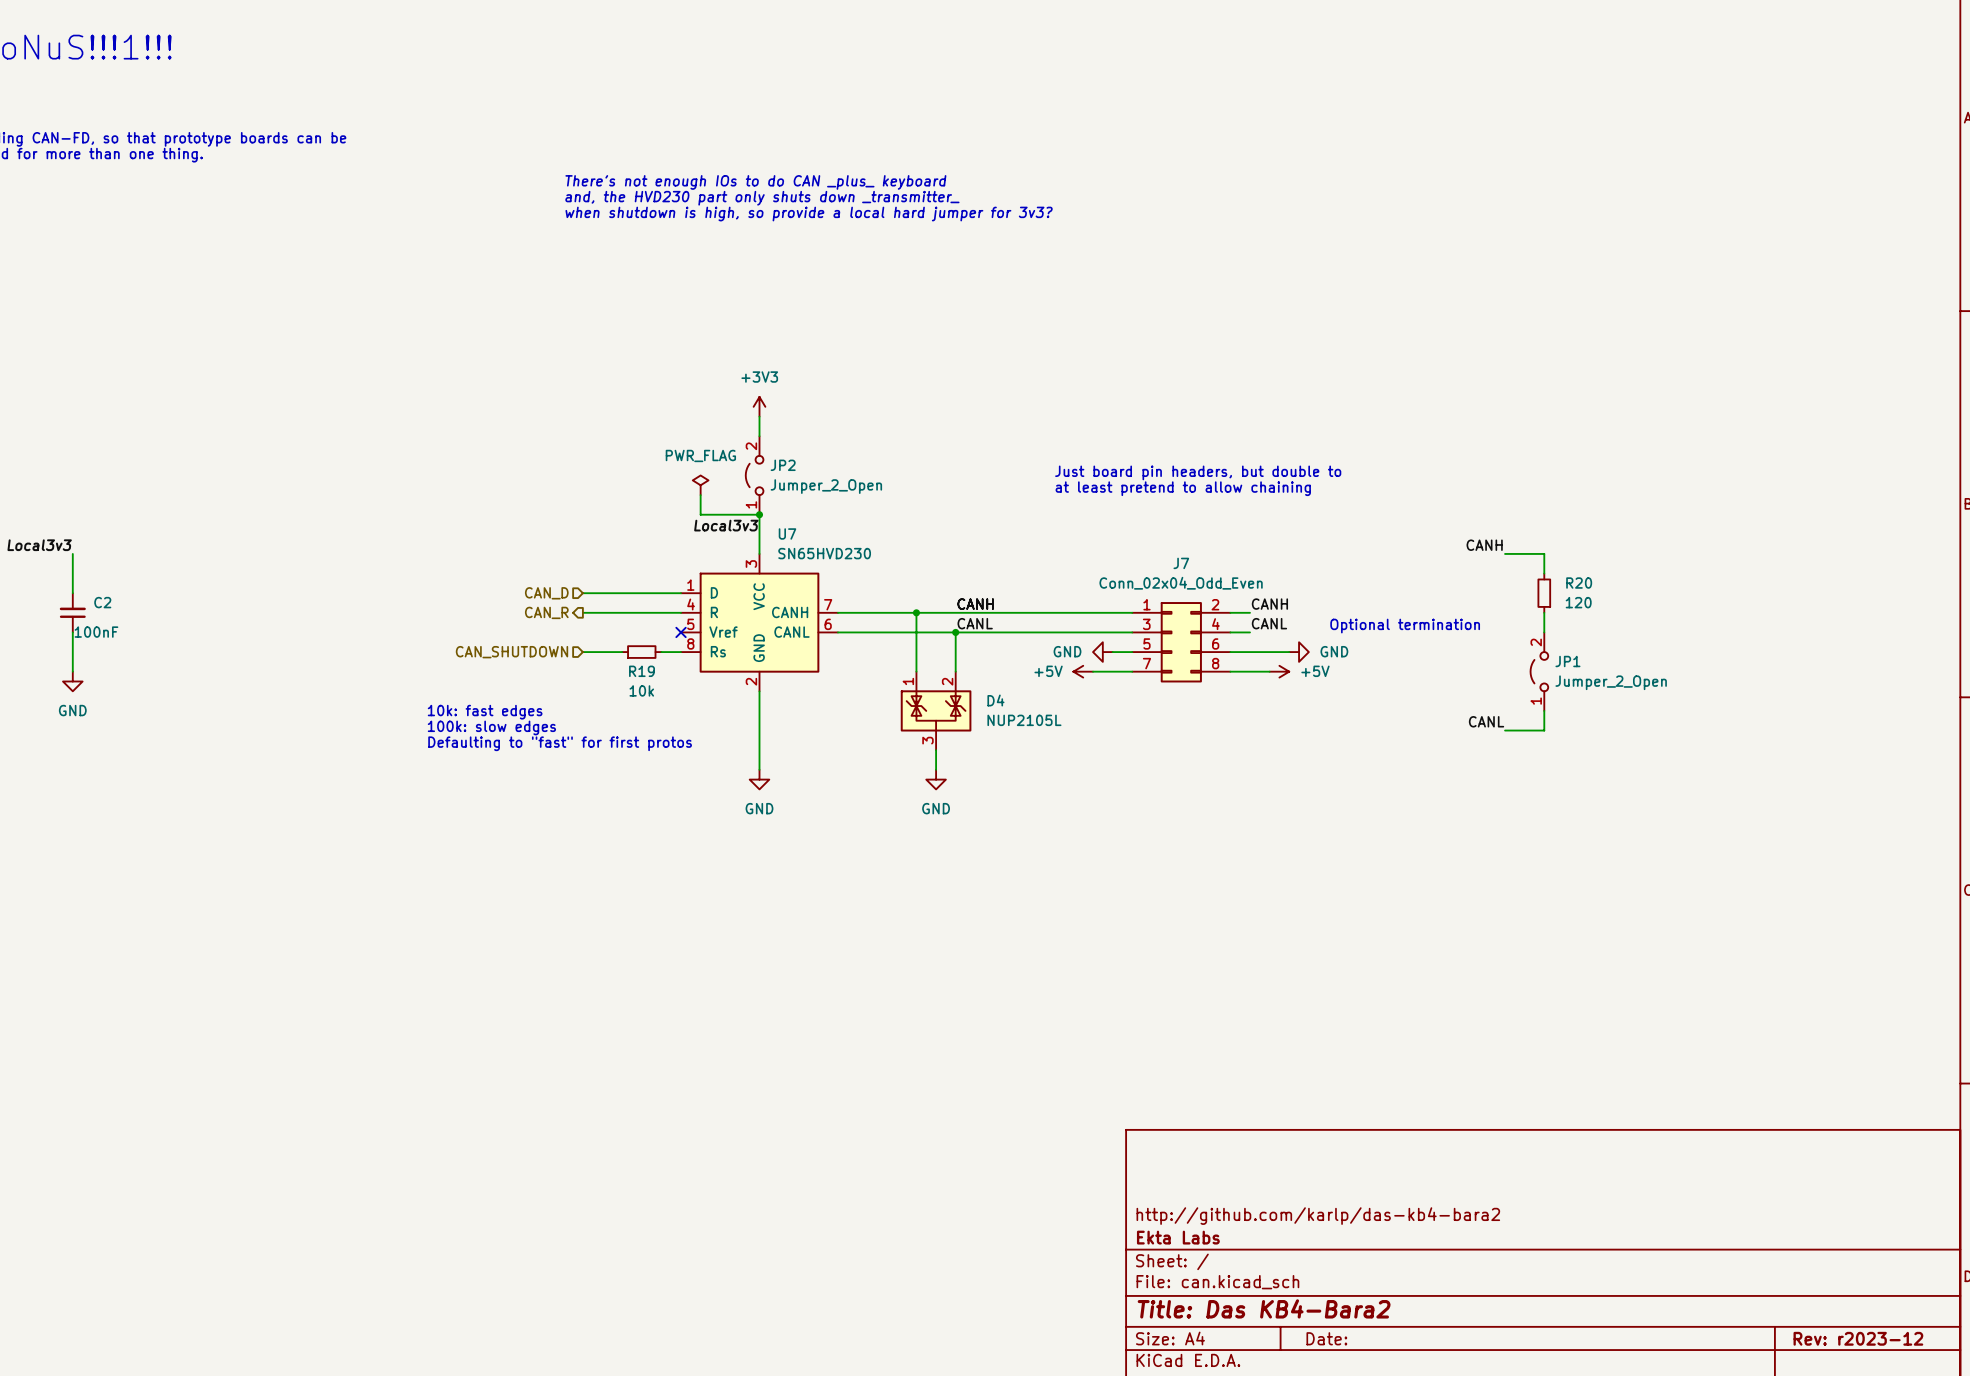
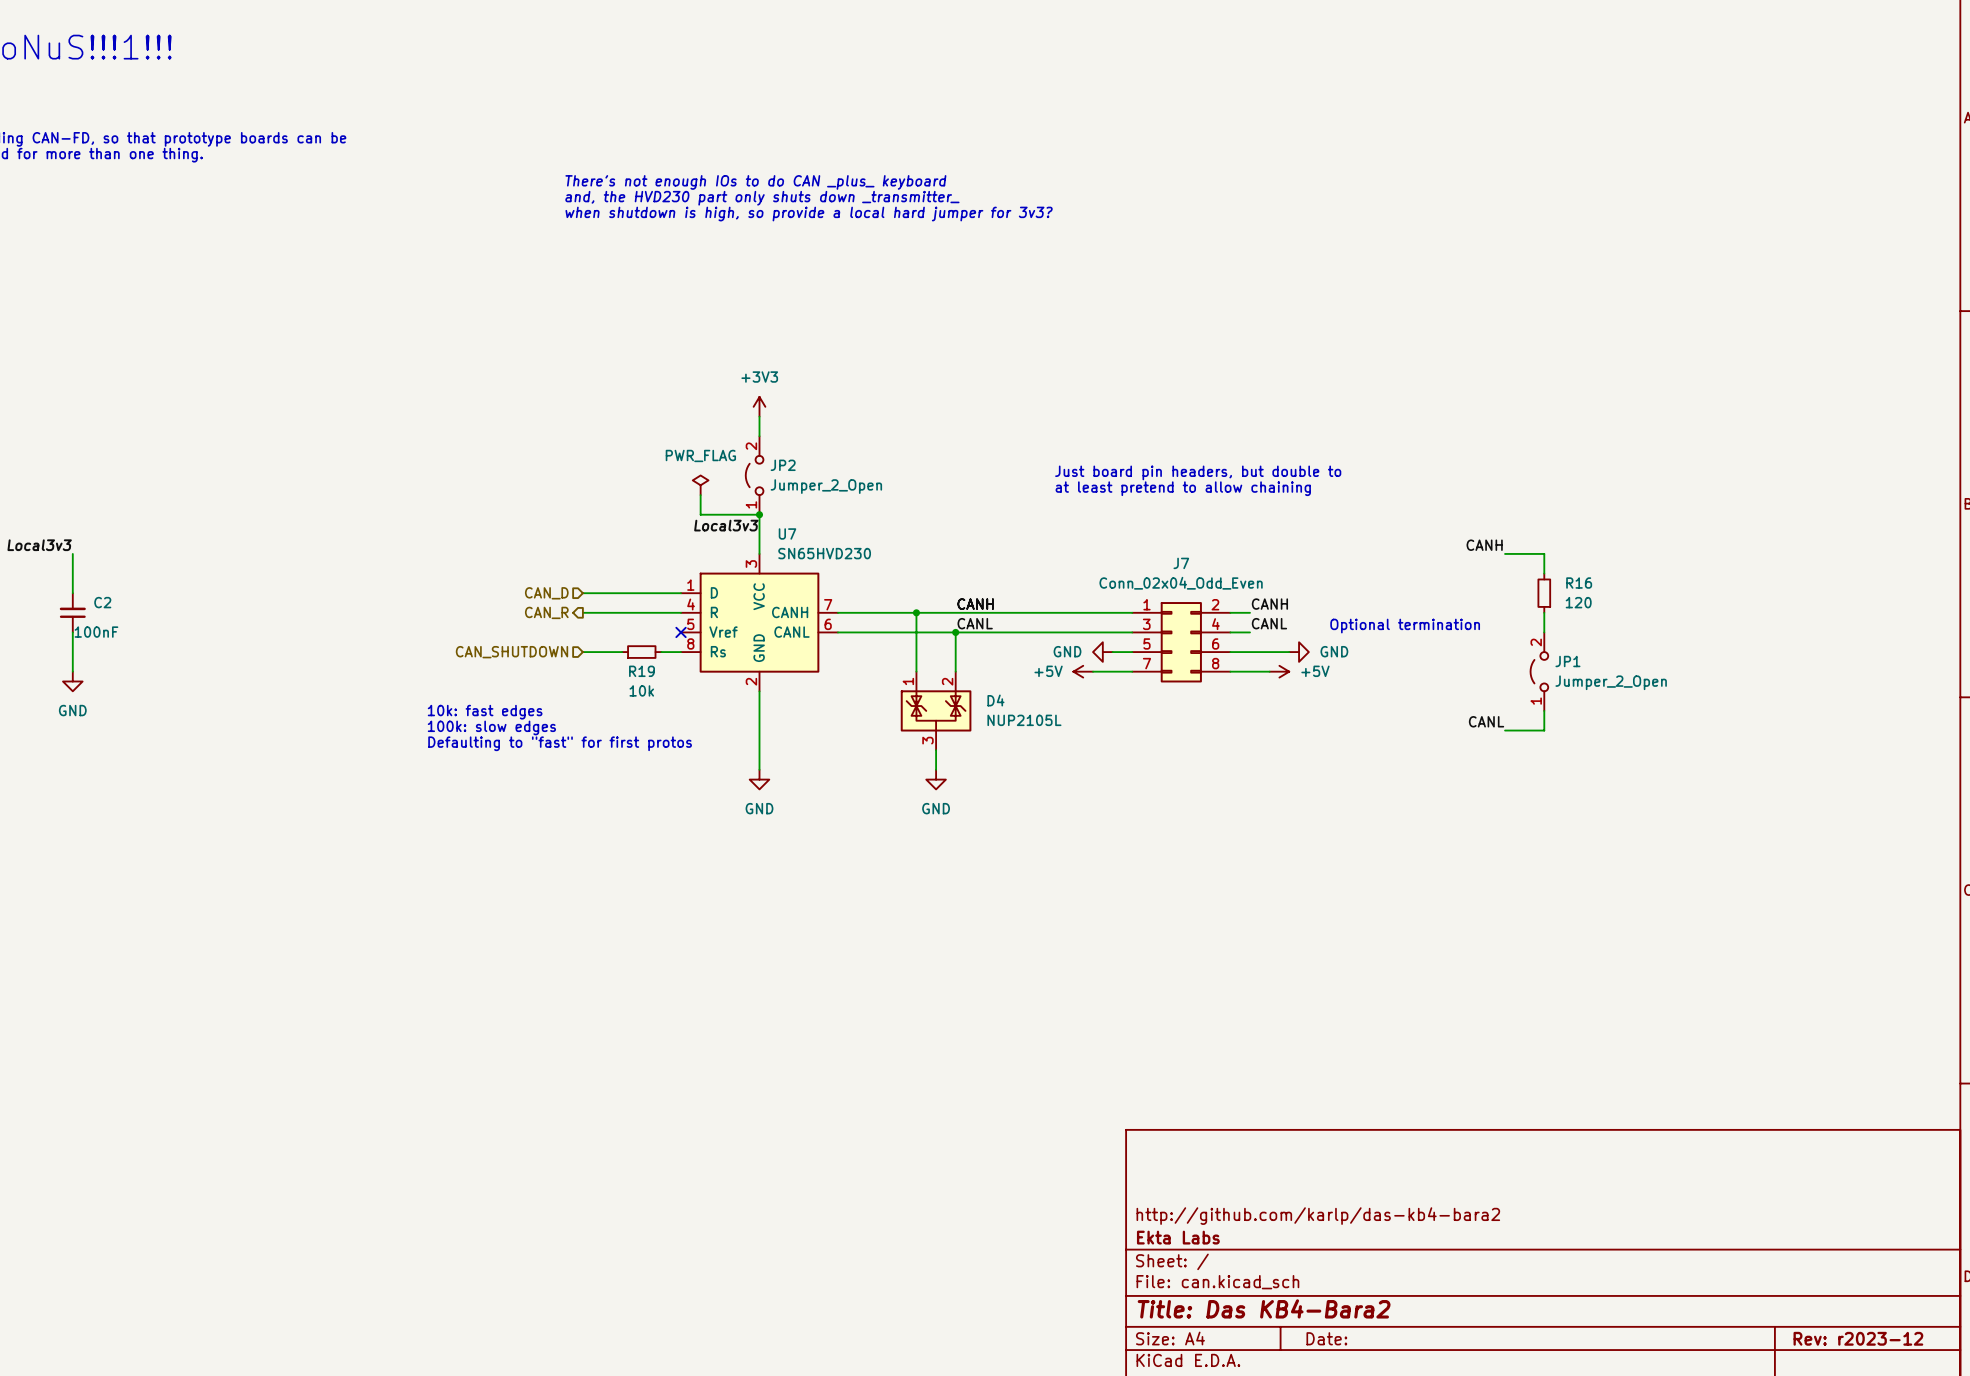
R20 name: R20 (1579, 583) -> R16 (1579, 583)

